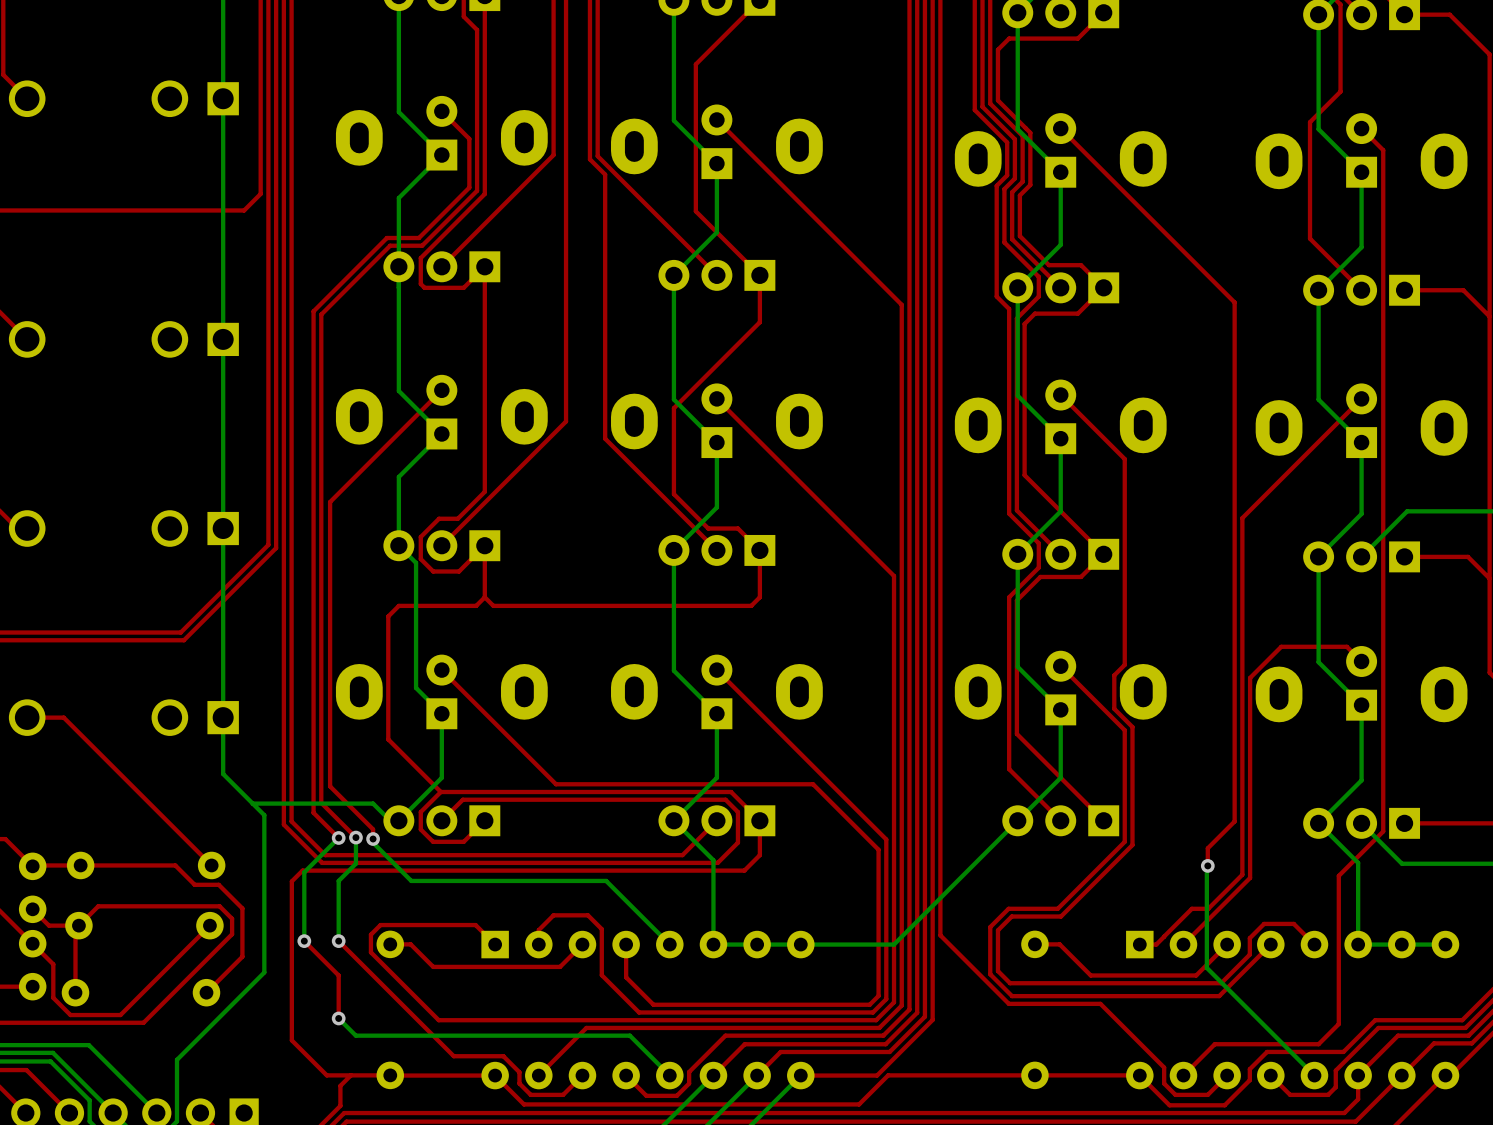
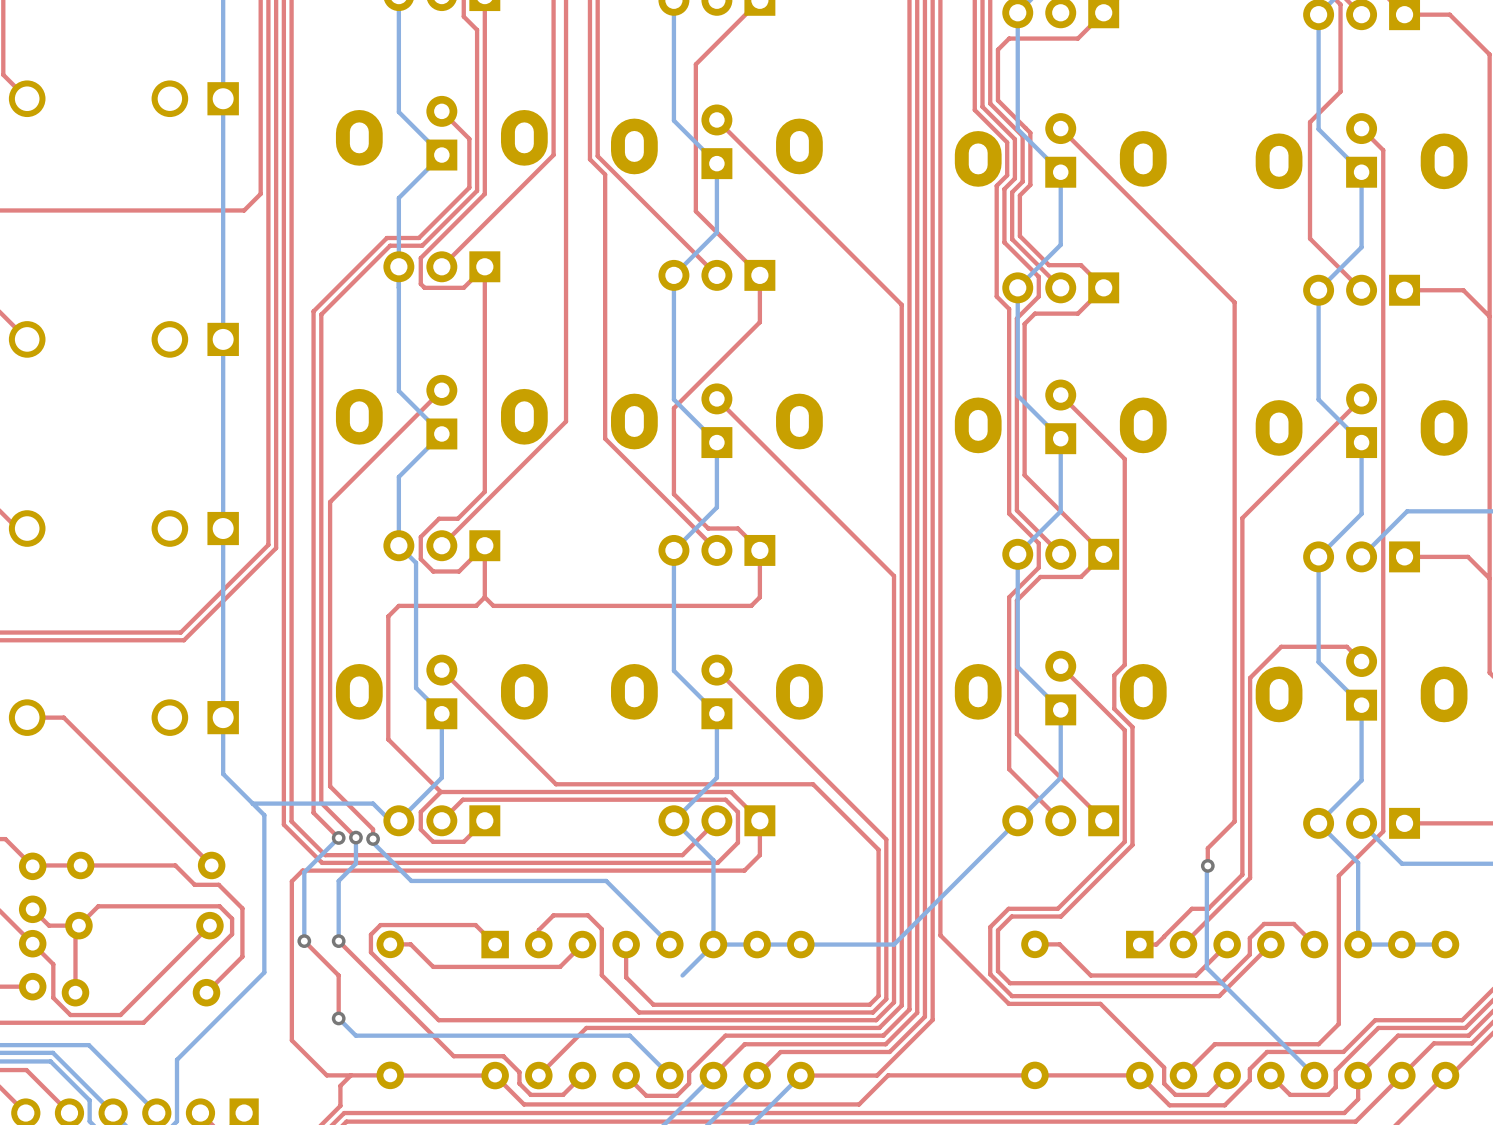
bottom track: none -> (713, 944) (682, 975)

